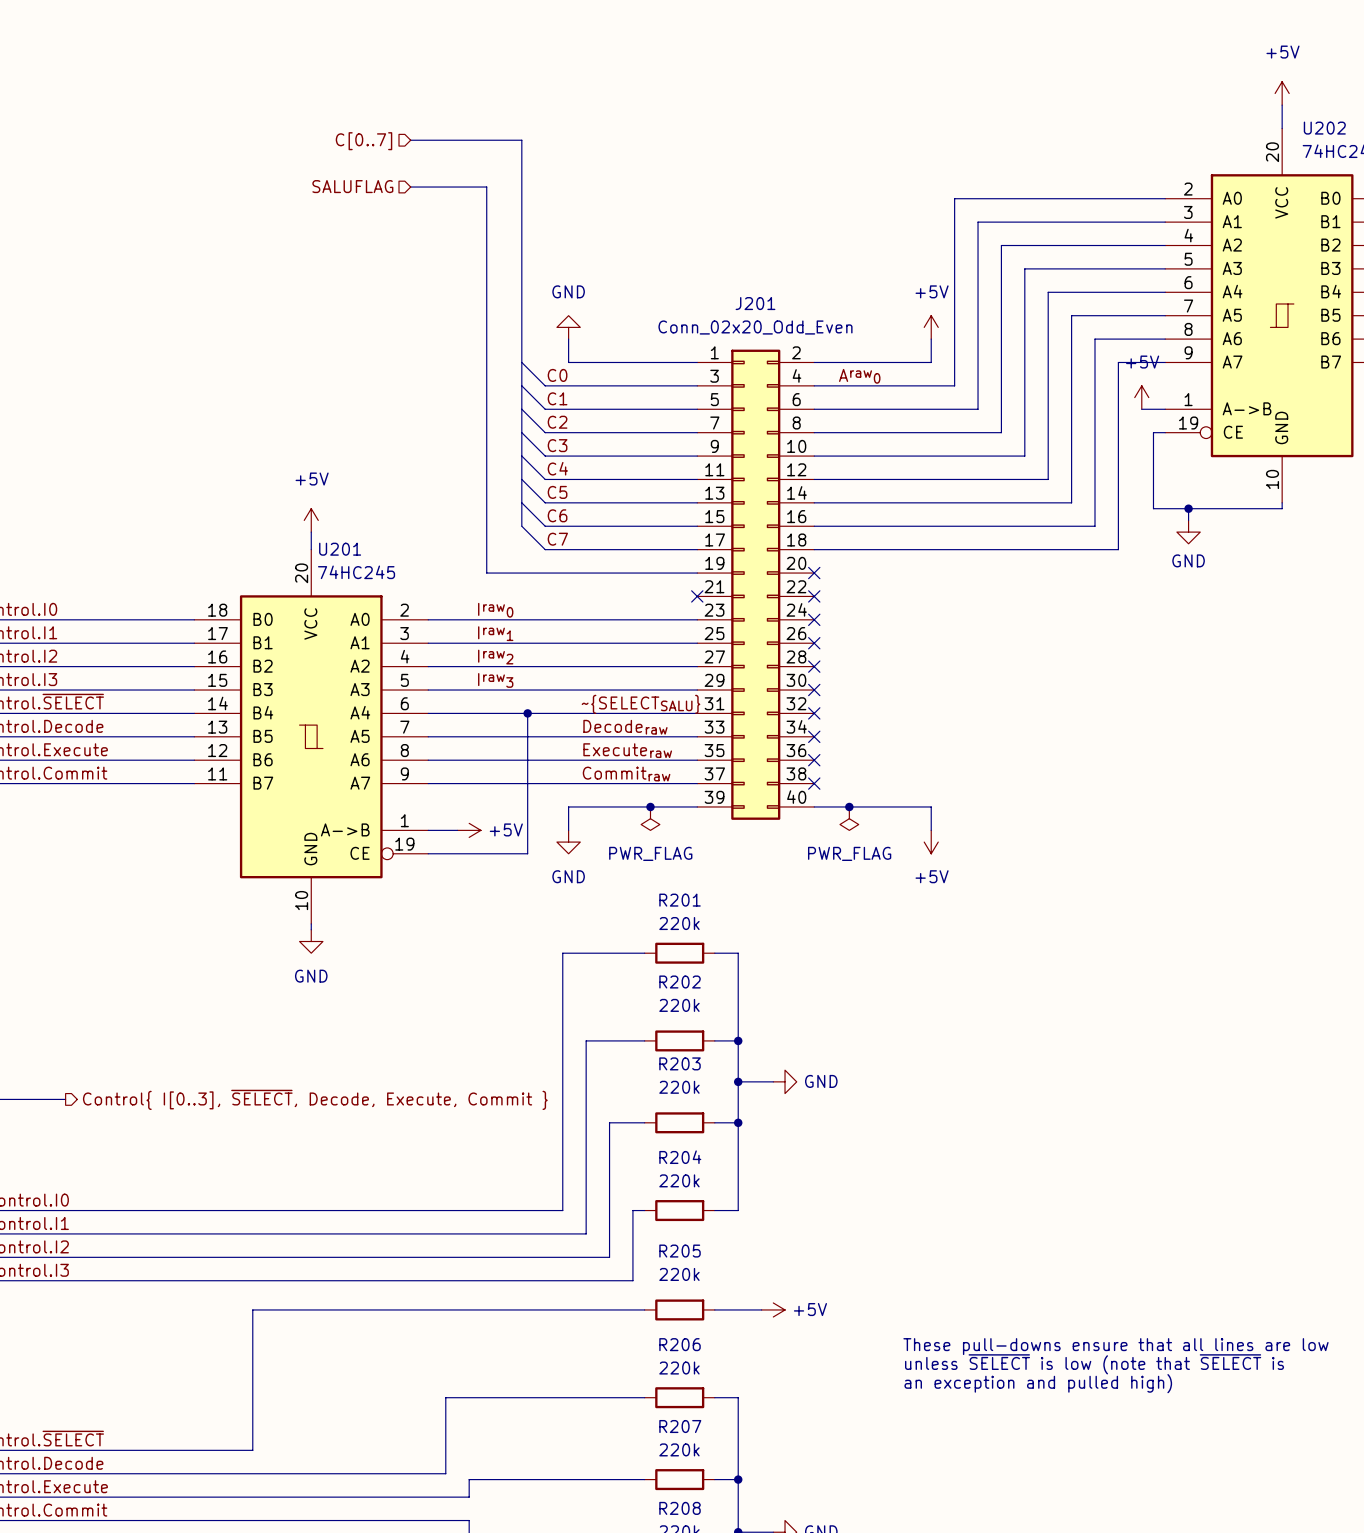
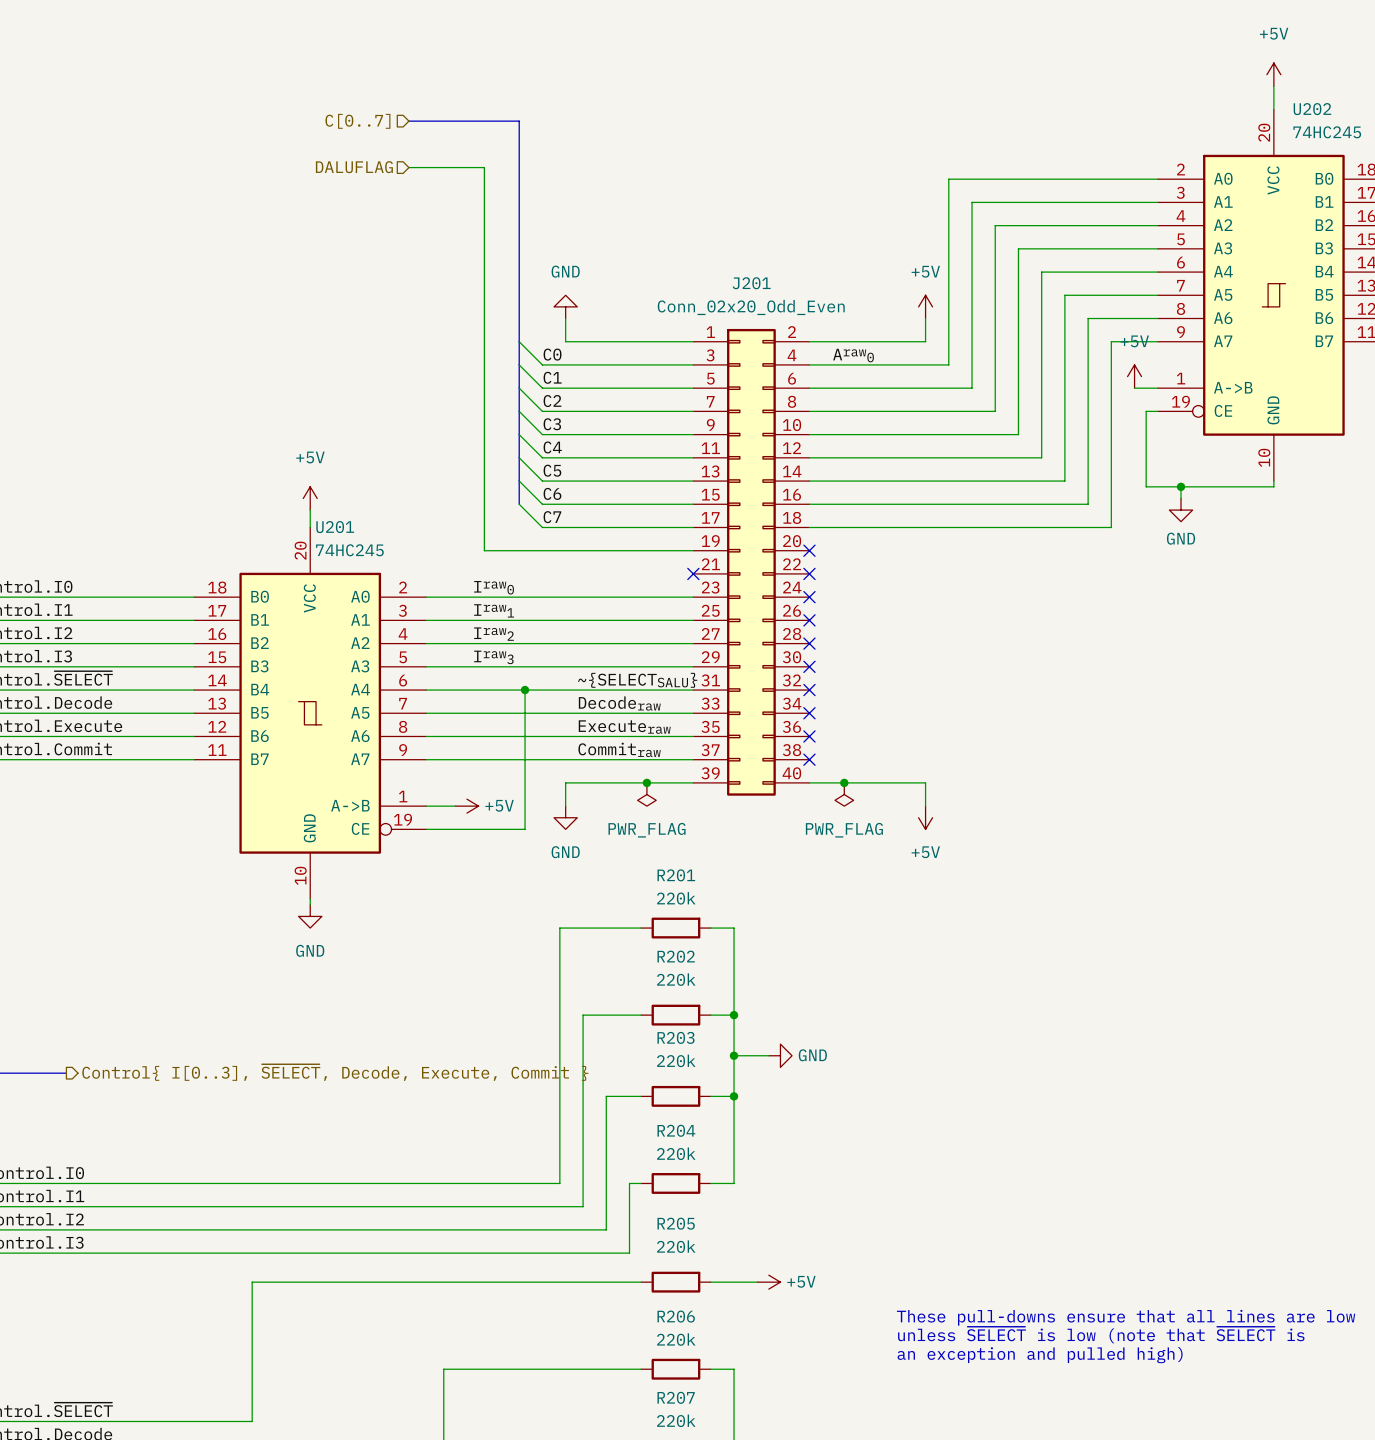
hierarchical label: SALUFLAG (352, 186) -> DALUFLAG (354, 167)

